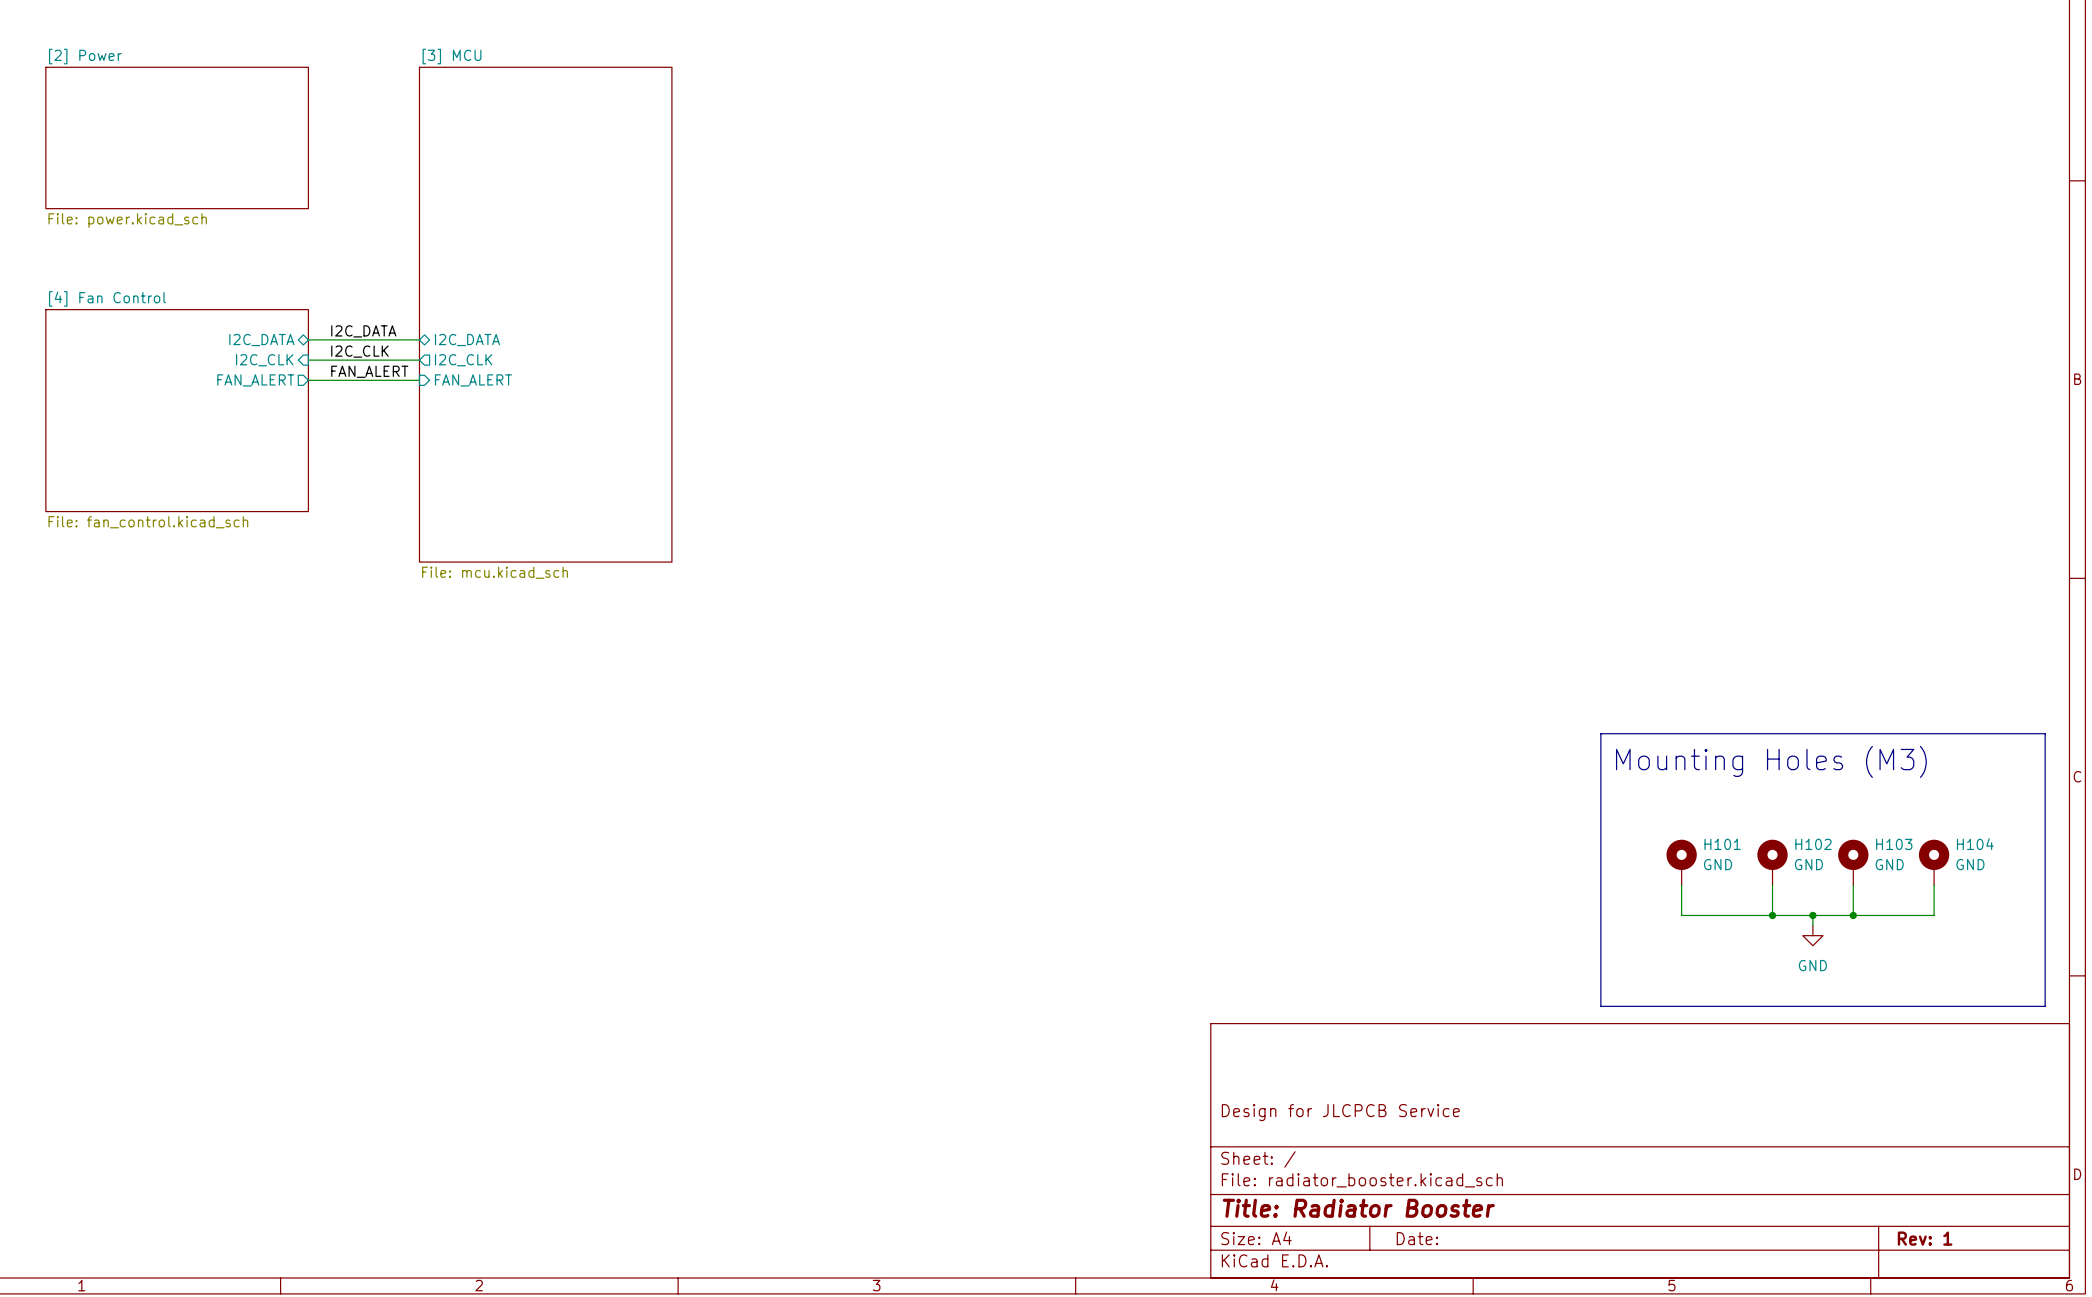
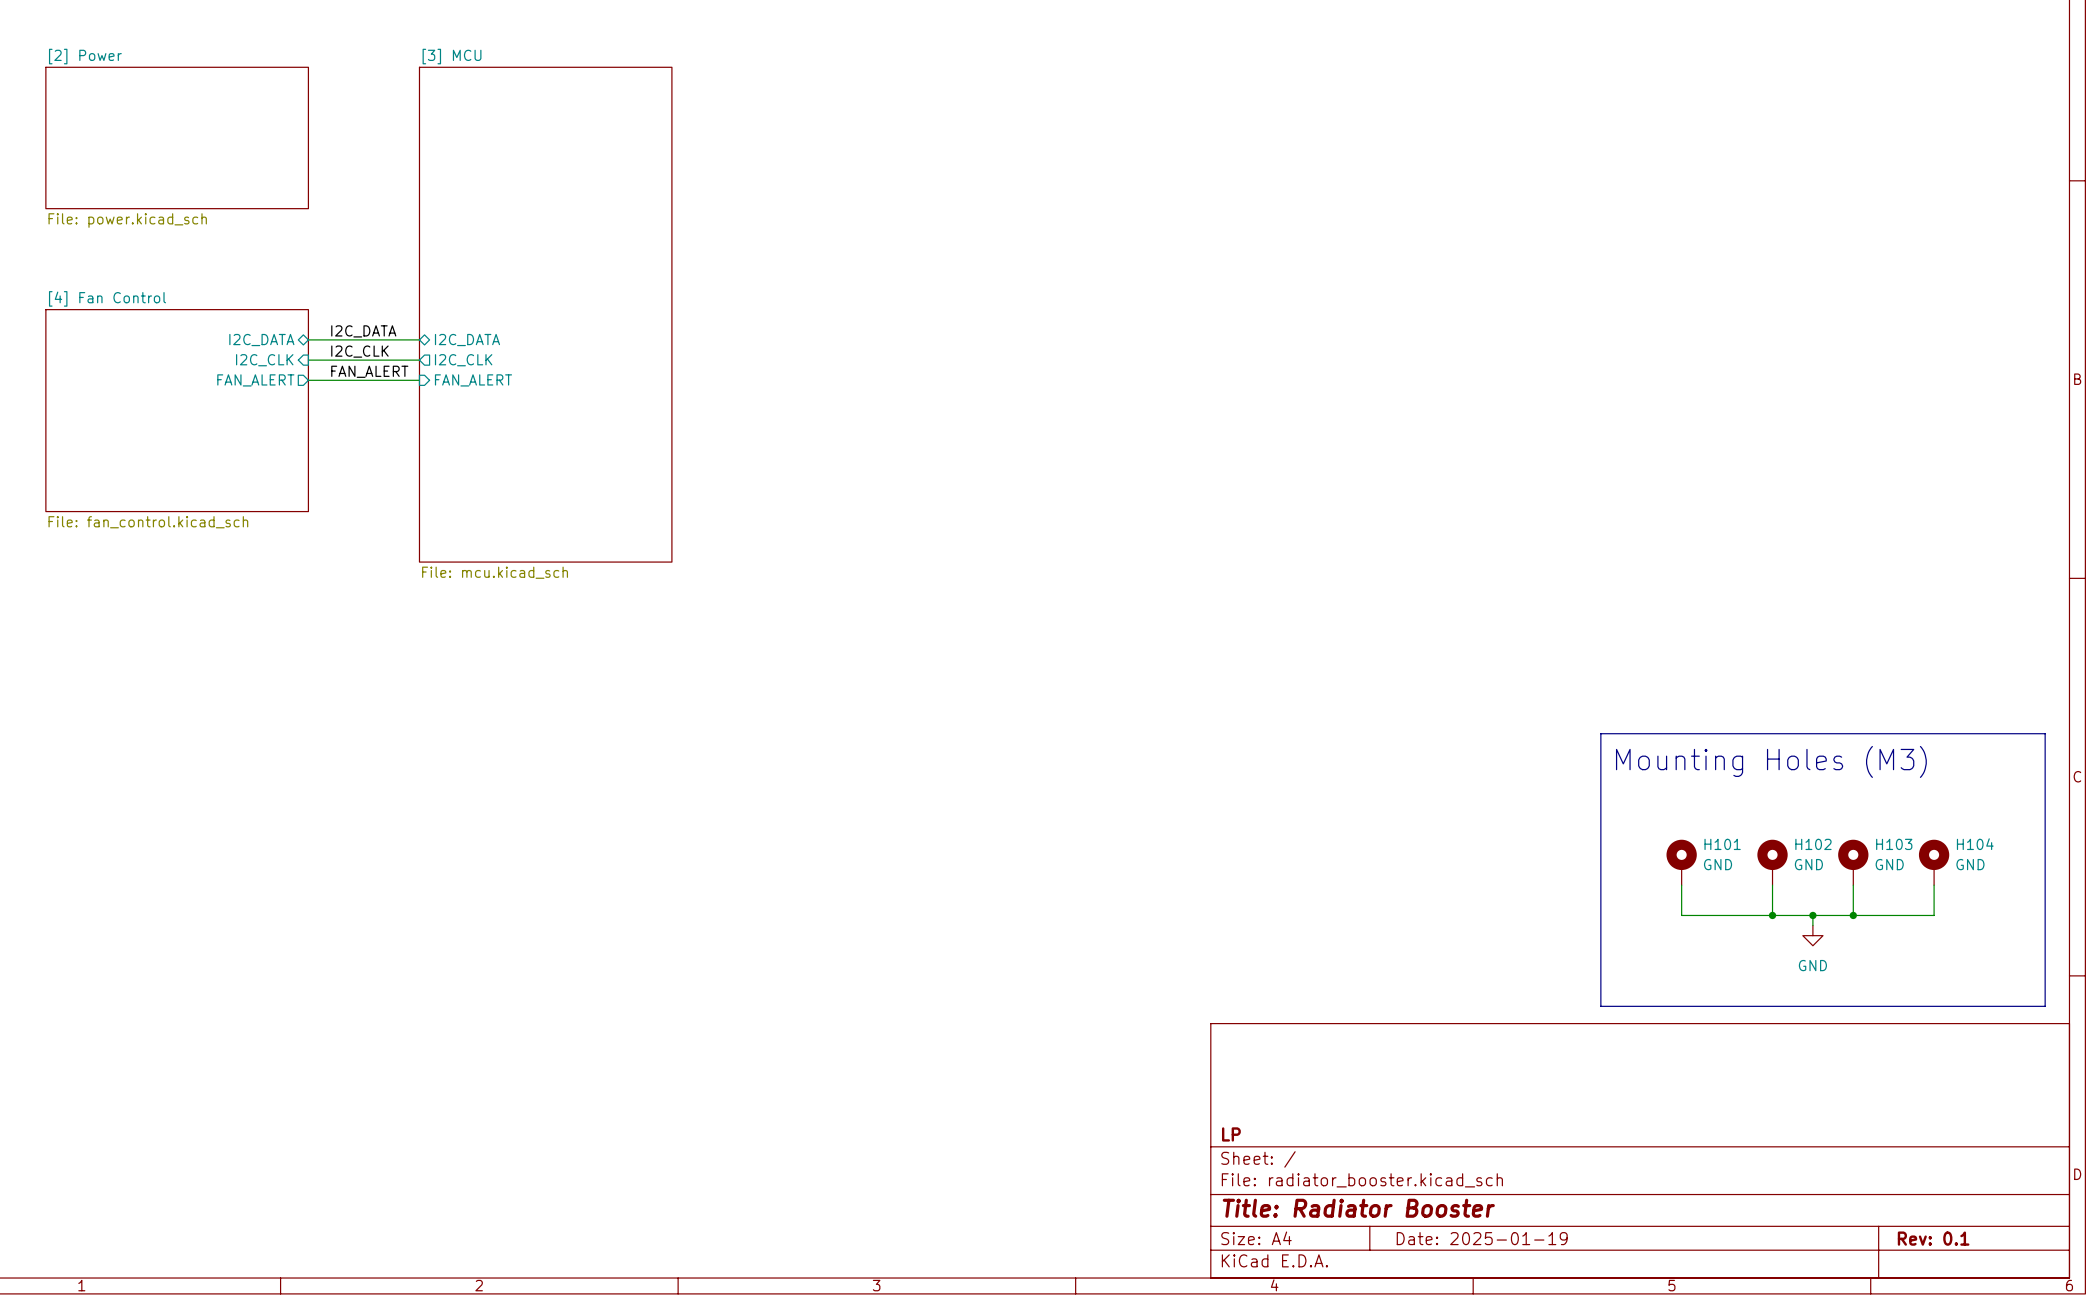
title block: Design for JLCPCB Service (1340, 1112) -> none
title block: none -> LP (1231, 1134)
title block: Date: (1417, 1238) -> Date: 2025-01-19 (1482, 1238)
title block: Rev: 1 (1925, 1238) -> Rev: 0.1 (1933, 1238)

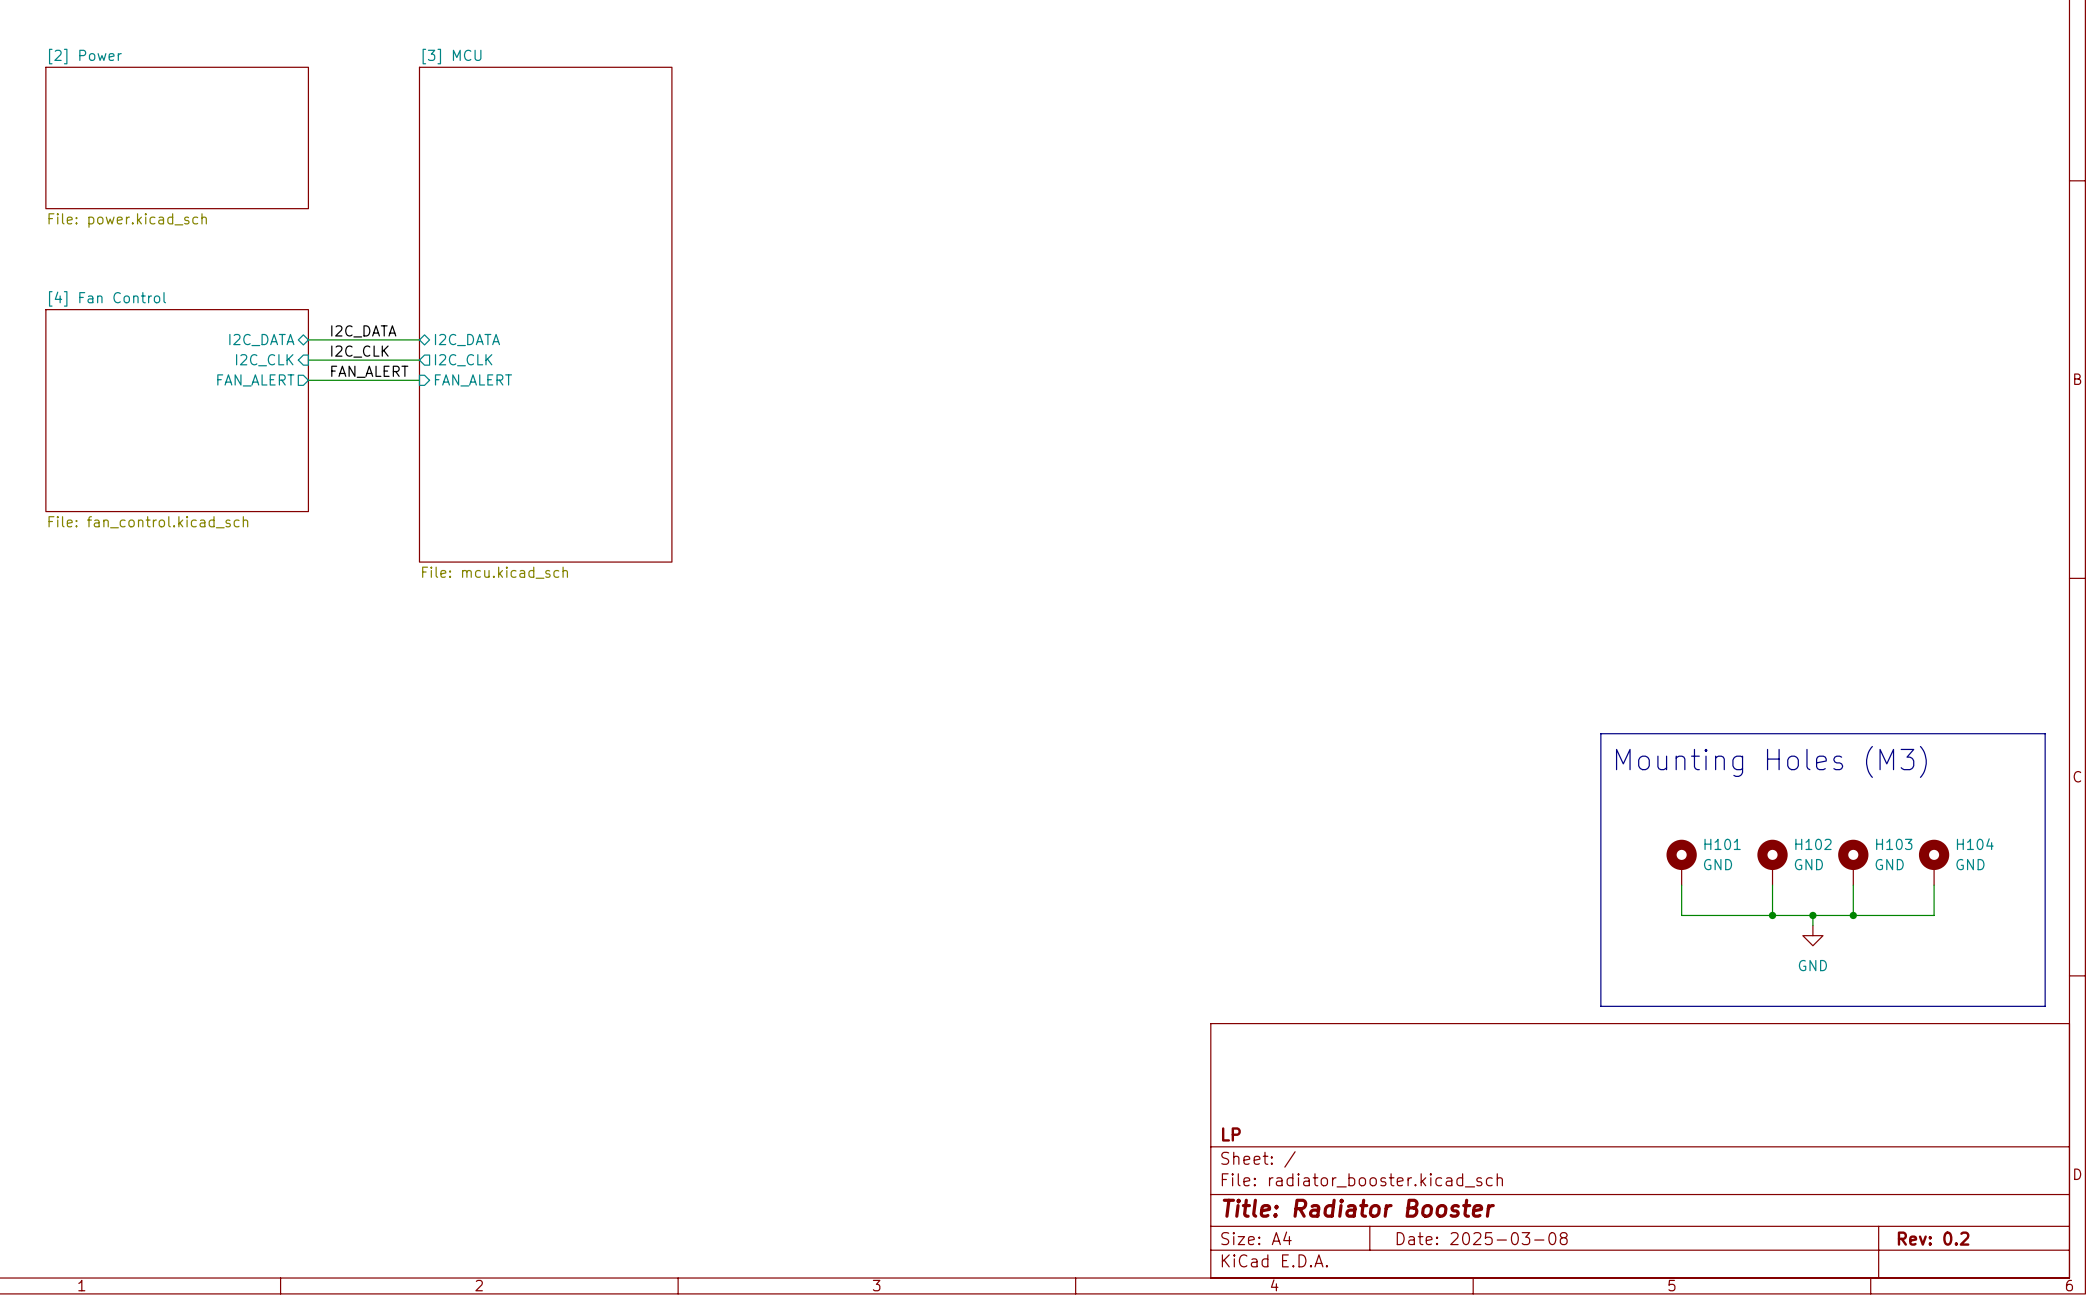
title block: Date: 2025-01-19 (1482, 1238) -> Date: 2025-03-08 (1482, 1238)
title block: Rev: 0.1 (1933, 1238) -> Rev: 0.2 (1933, 1238)

